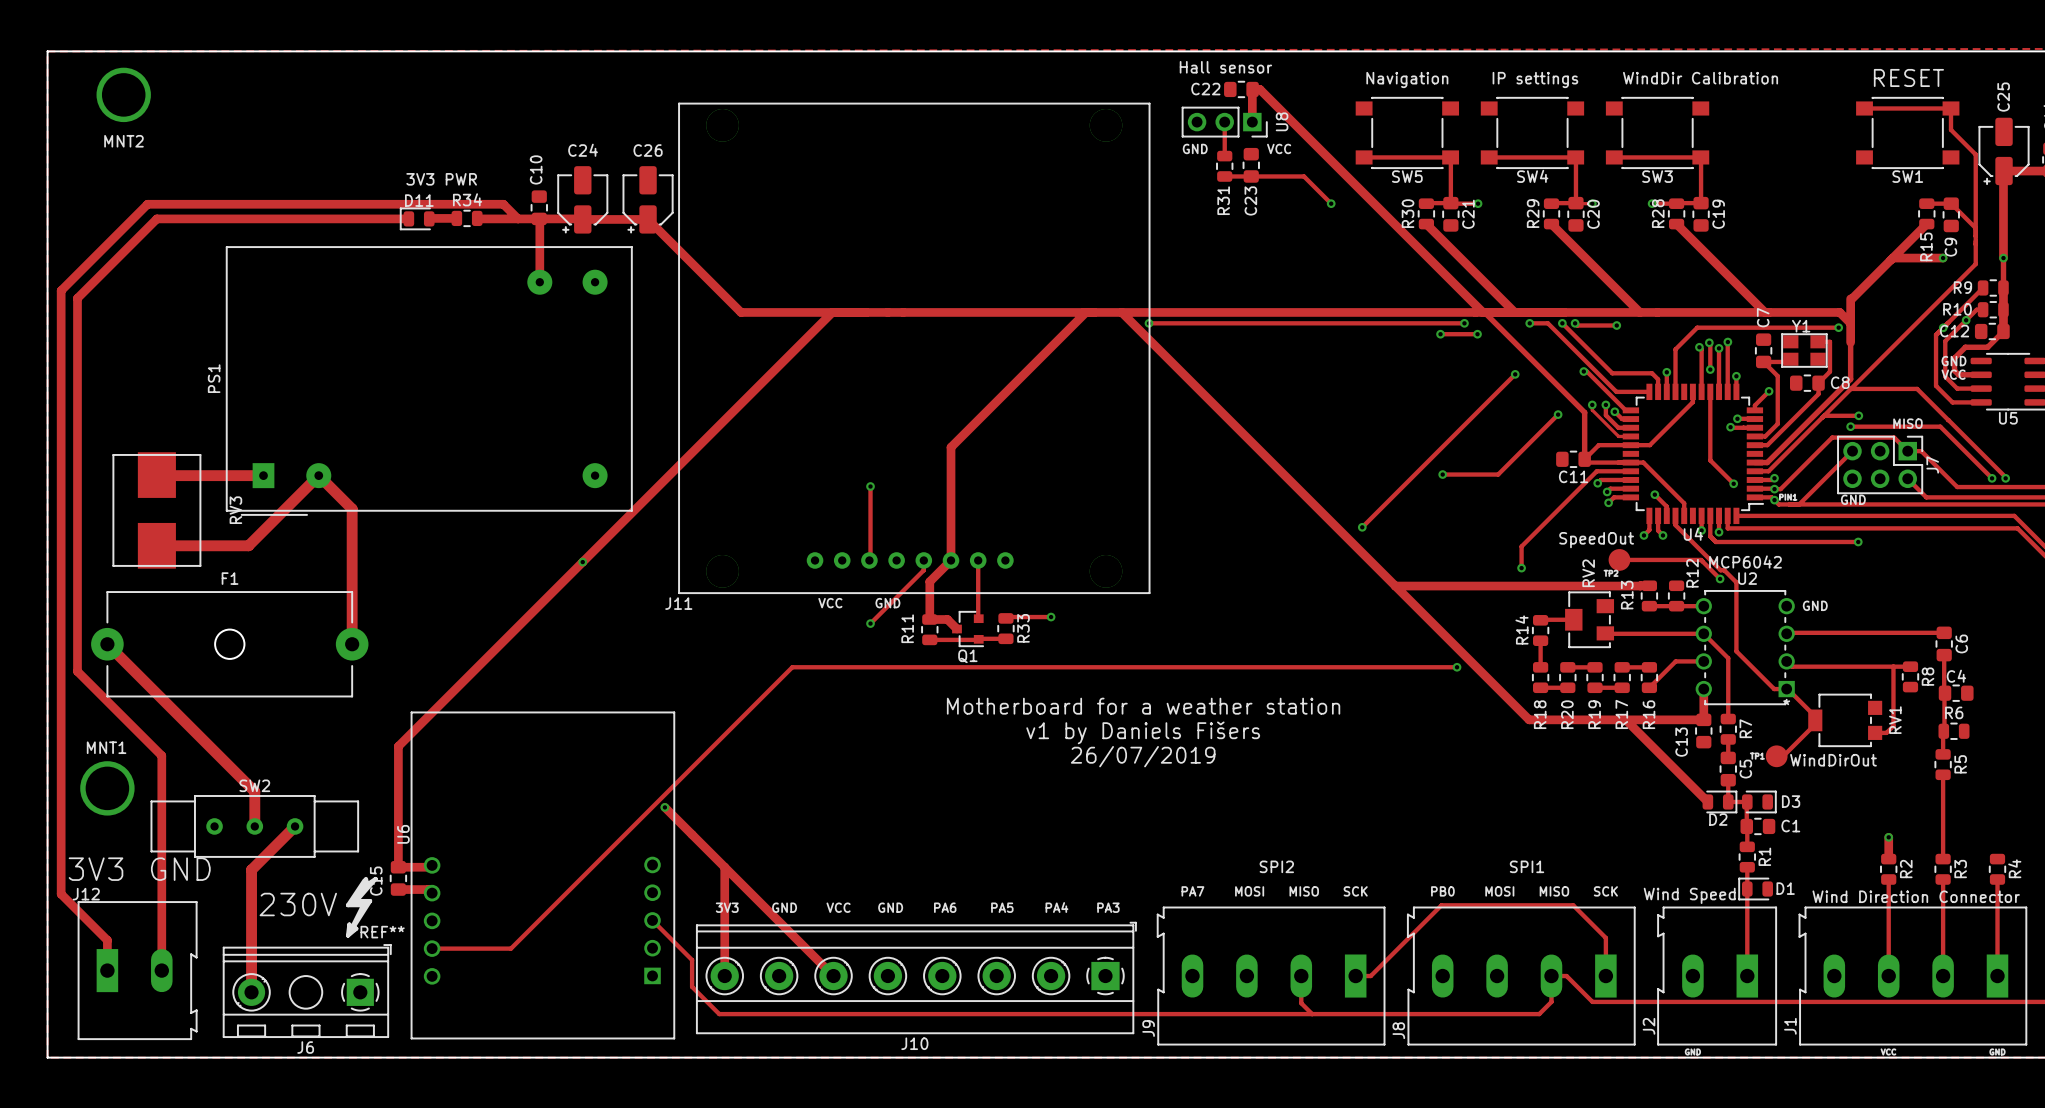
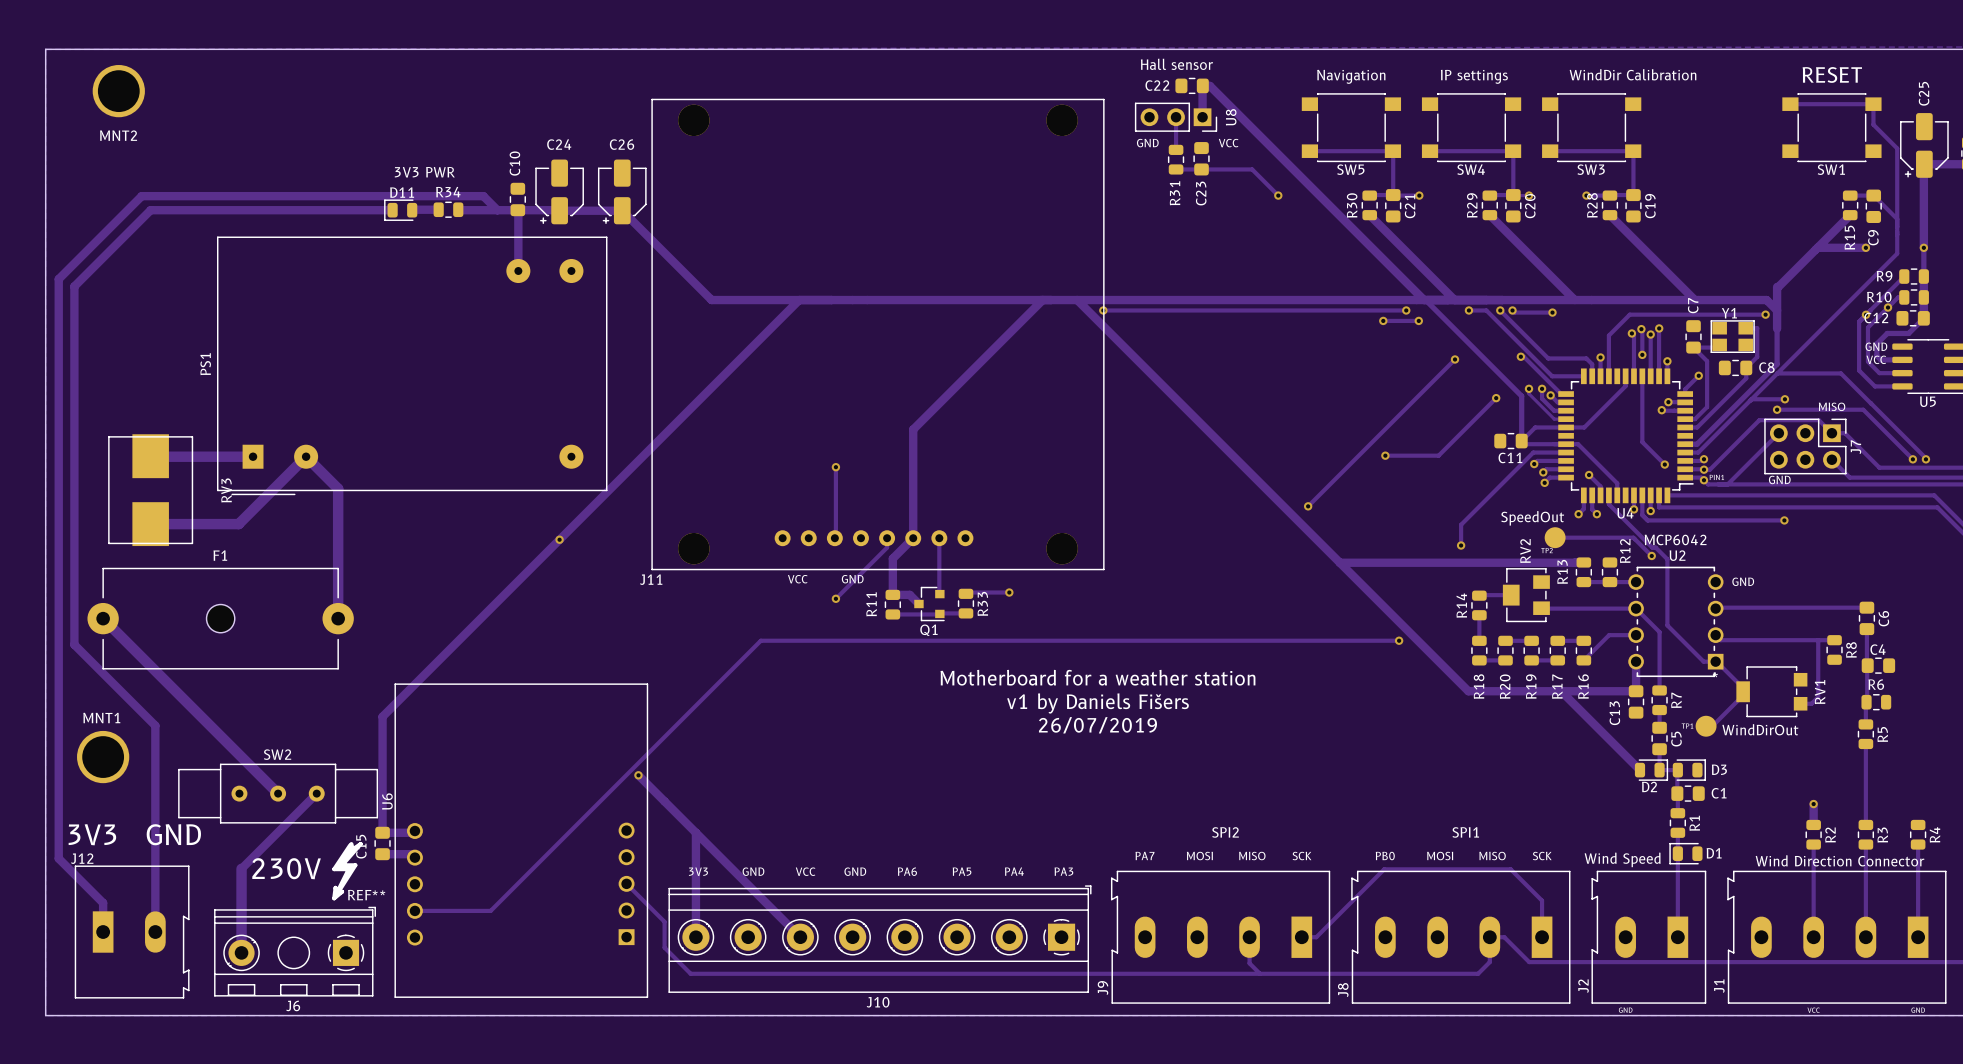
track: (254, 791) (254, 826) -> (244, 760) (278, 793)
SW2 position: (254, 826) -> (278, 793)
track: (295, 826) (251, 869) (251, 904) -> (316, 793) (241, 868)

